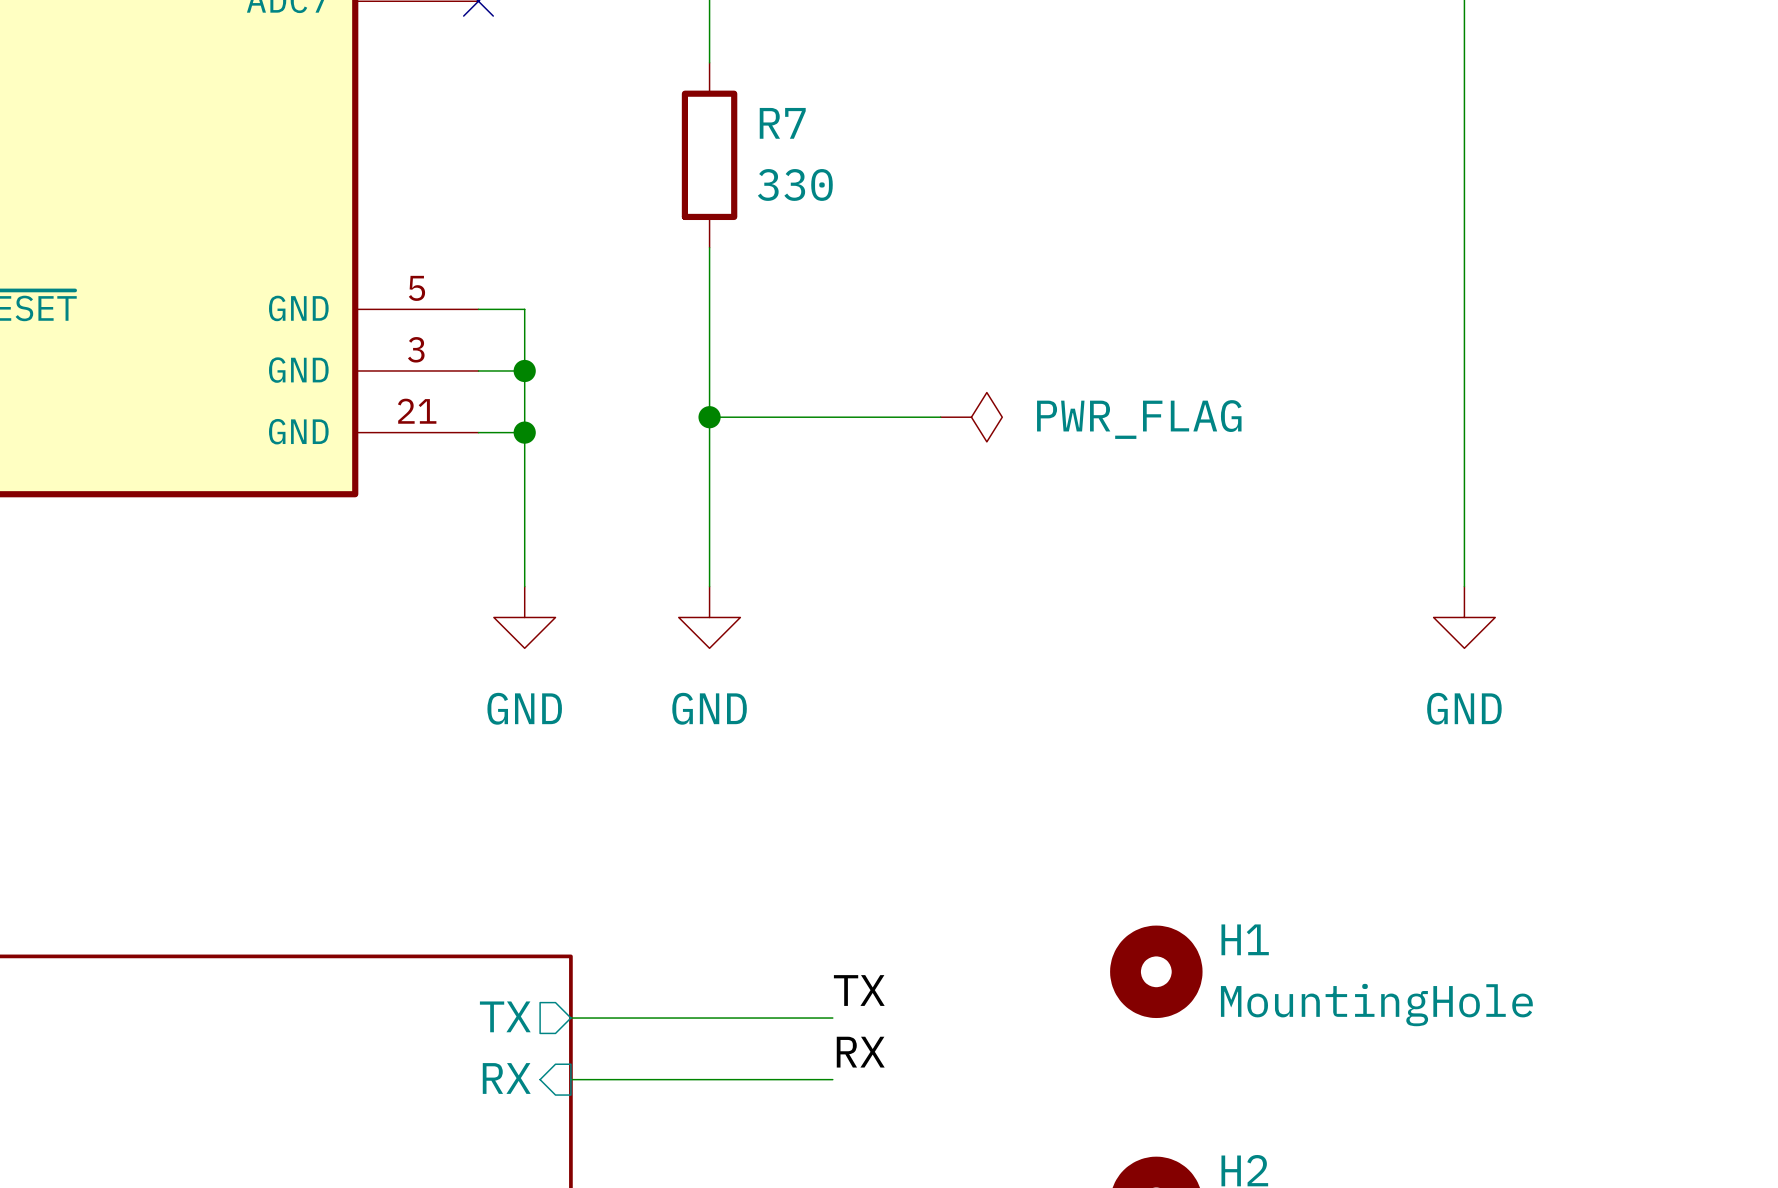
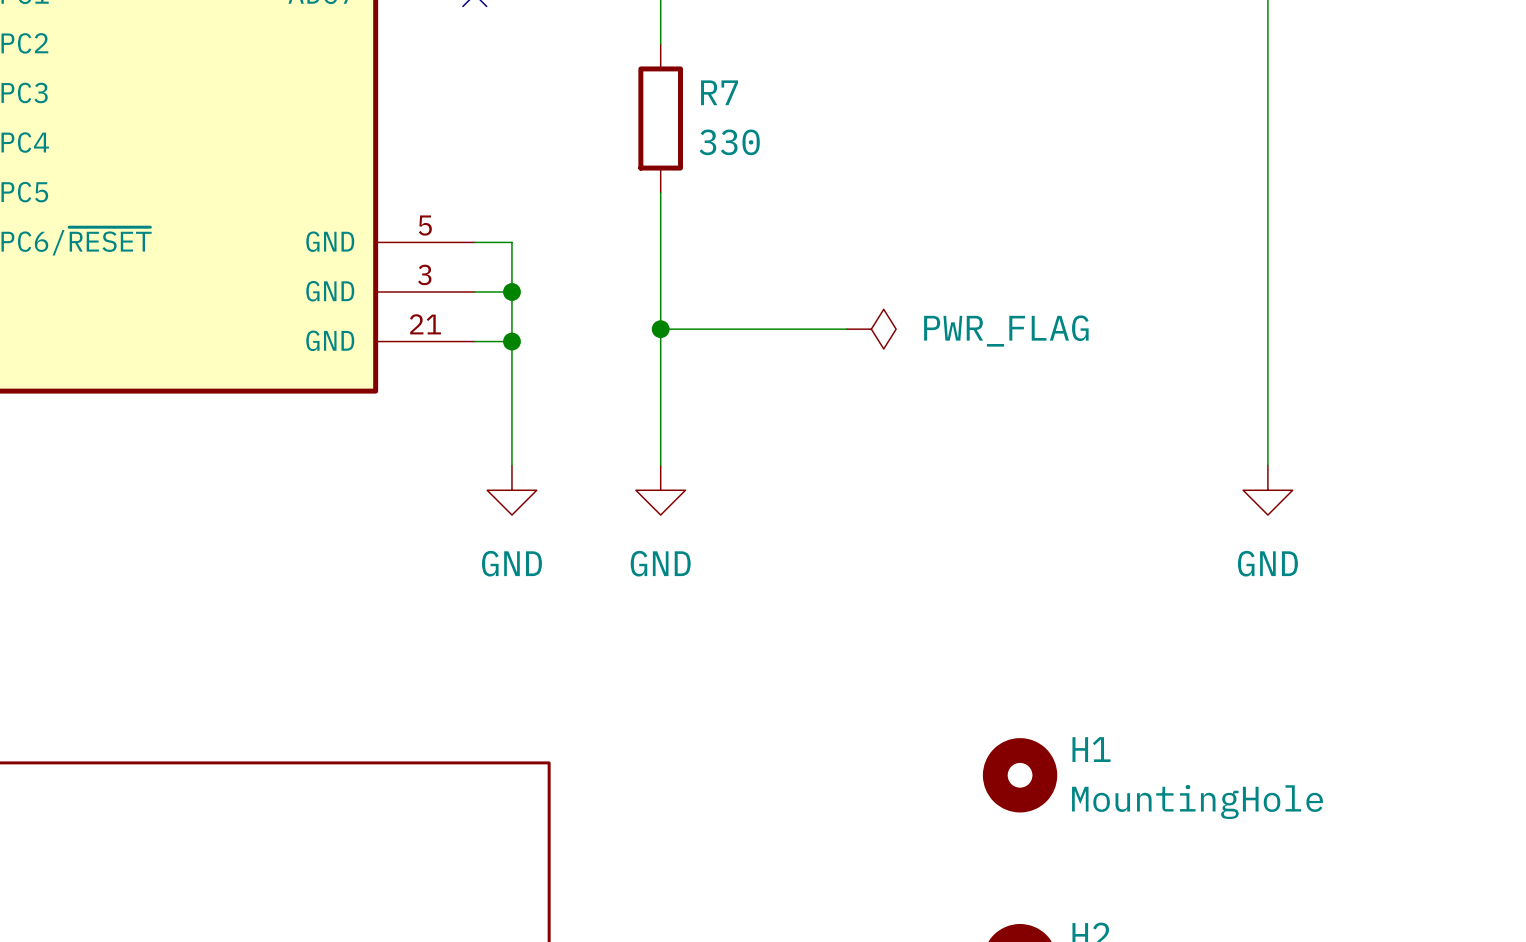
label: TX (859, 990) -> none
sheet pin: TX (505, 1016) -> none
wire: (570, 1018) (832, 1018) -> none
label: RX (860, 1052) -> none
sheet pin: RX (506, 1078) -> none
wire: (570, 1079) (832, 1079) -> none

